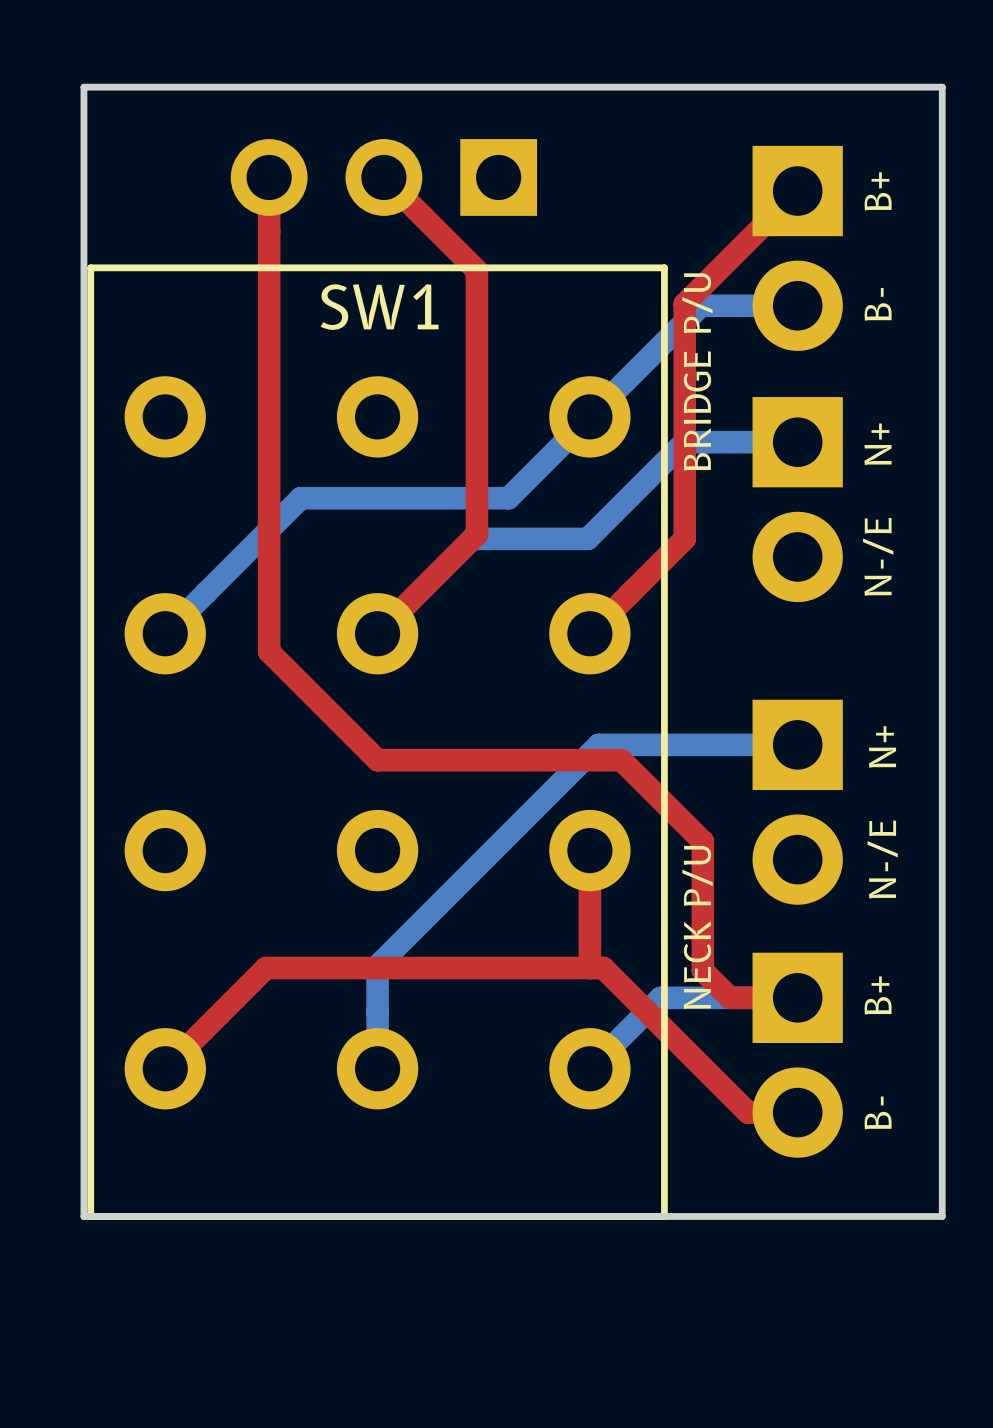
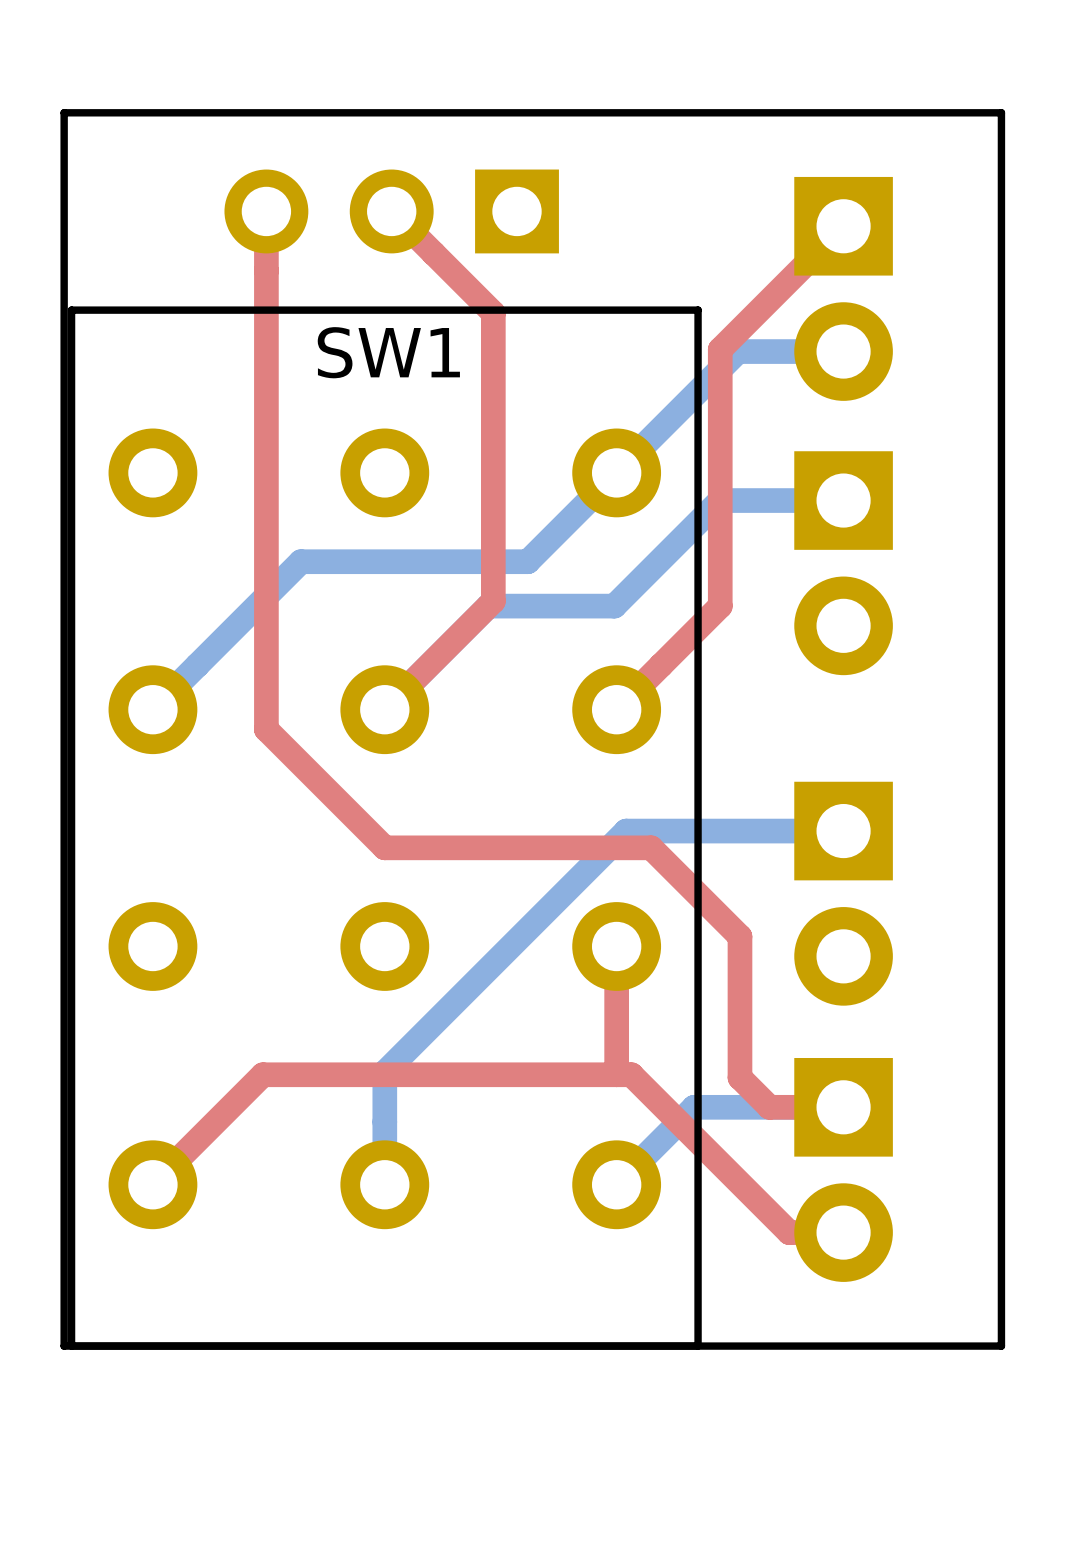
text: B+ (878, 191) -> none
text: B- (878, 304) -> none
text: BRIDGE P/U (697, 371) -> none
text: N+ (878, 444) -> none
text: N-/E (878, 556) -> none
text: N+ (882, 746) -> none
text: N-/E (882, 859) -> none
text: NECK P/U (697, 927) -> none
text: B+ (878, 995) -> none
text: B- (878, 1112) -> none

